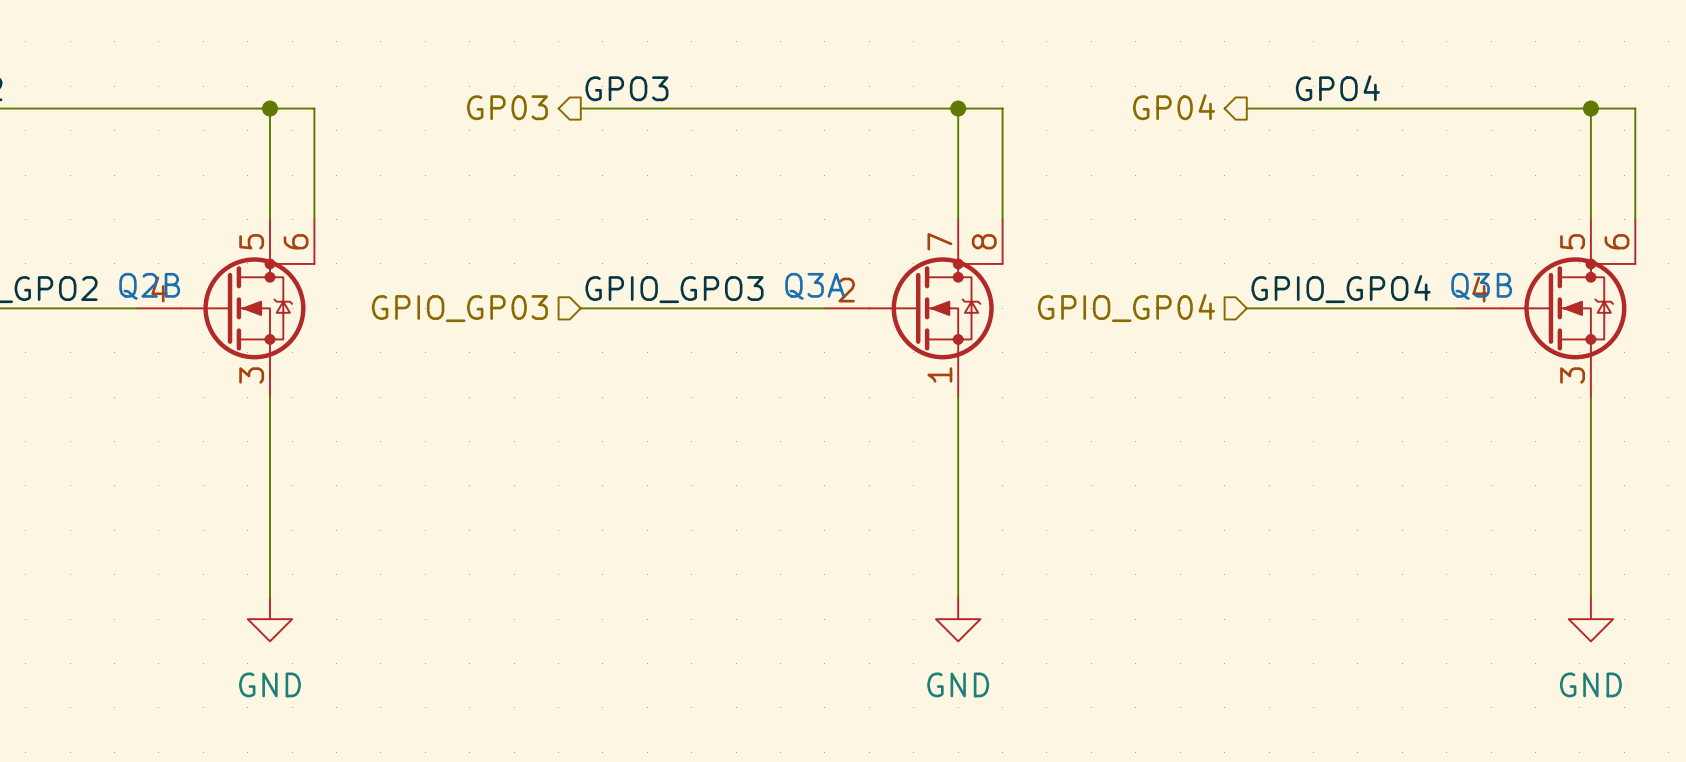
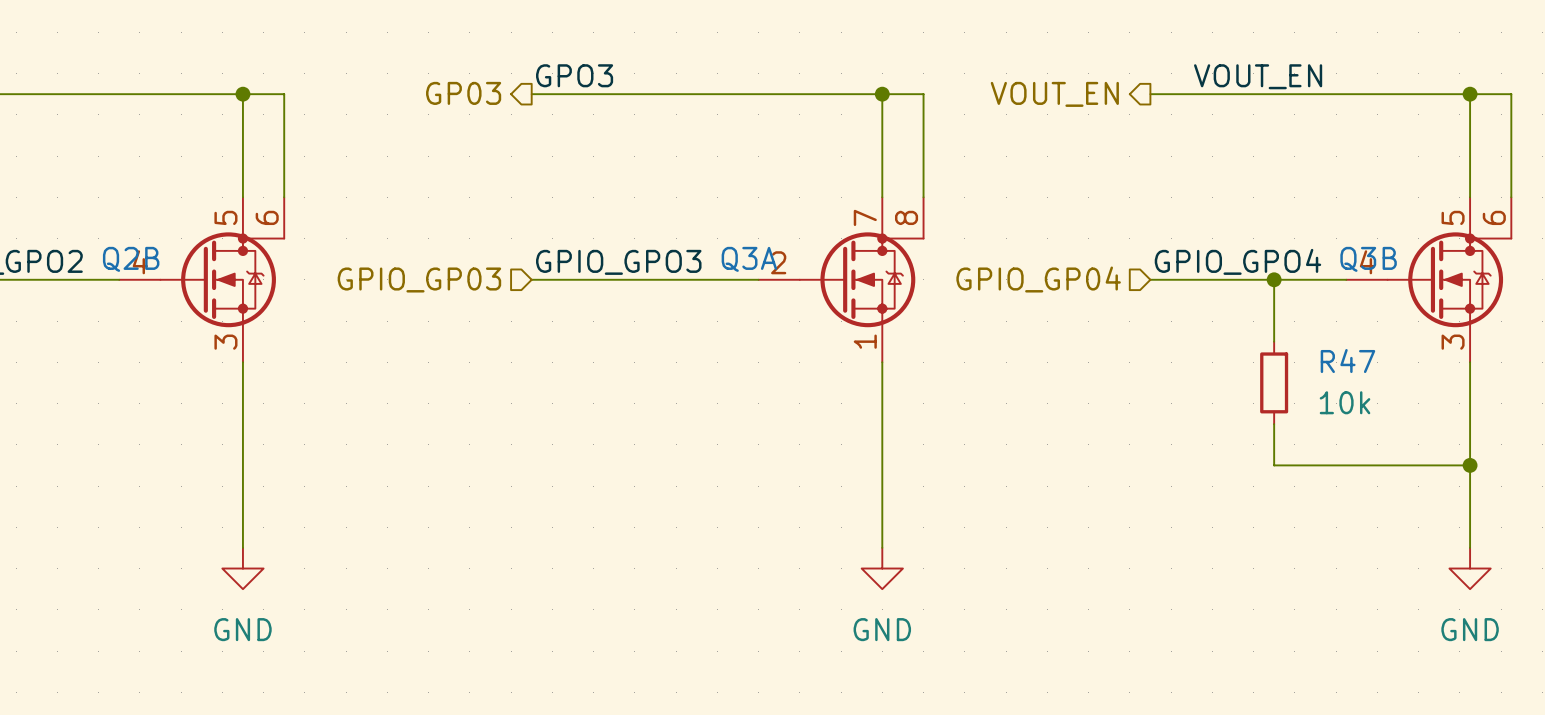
label: GPO4 (1337, 88) -> VOUT_EN (1258, 76)
hierarchical label: GP04 (1174, 107) -> VOUT_EN (1054, 94)
wire: none -> (1274, 279) (1274, 341)
junction: none -> (1274, 279)
R47: none -> 10k (1274, 382)
wire: none -> (1274, 424) (1274, 465) (1470, 465)
junction: none -> (1470, 465)

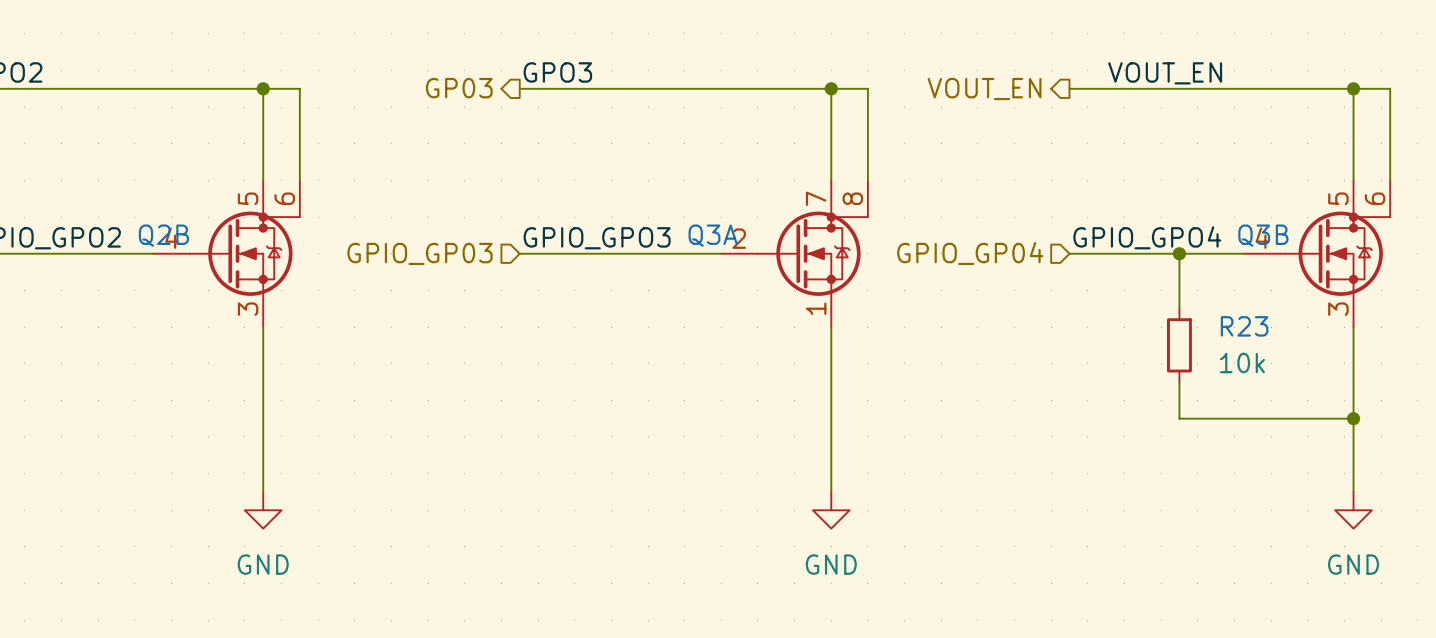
R47 name: R47 (1347, 361) -> R23 (1244, 326)

